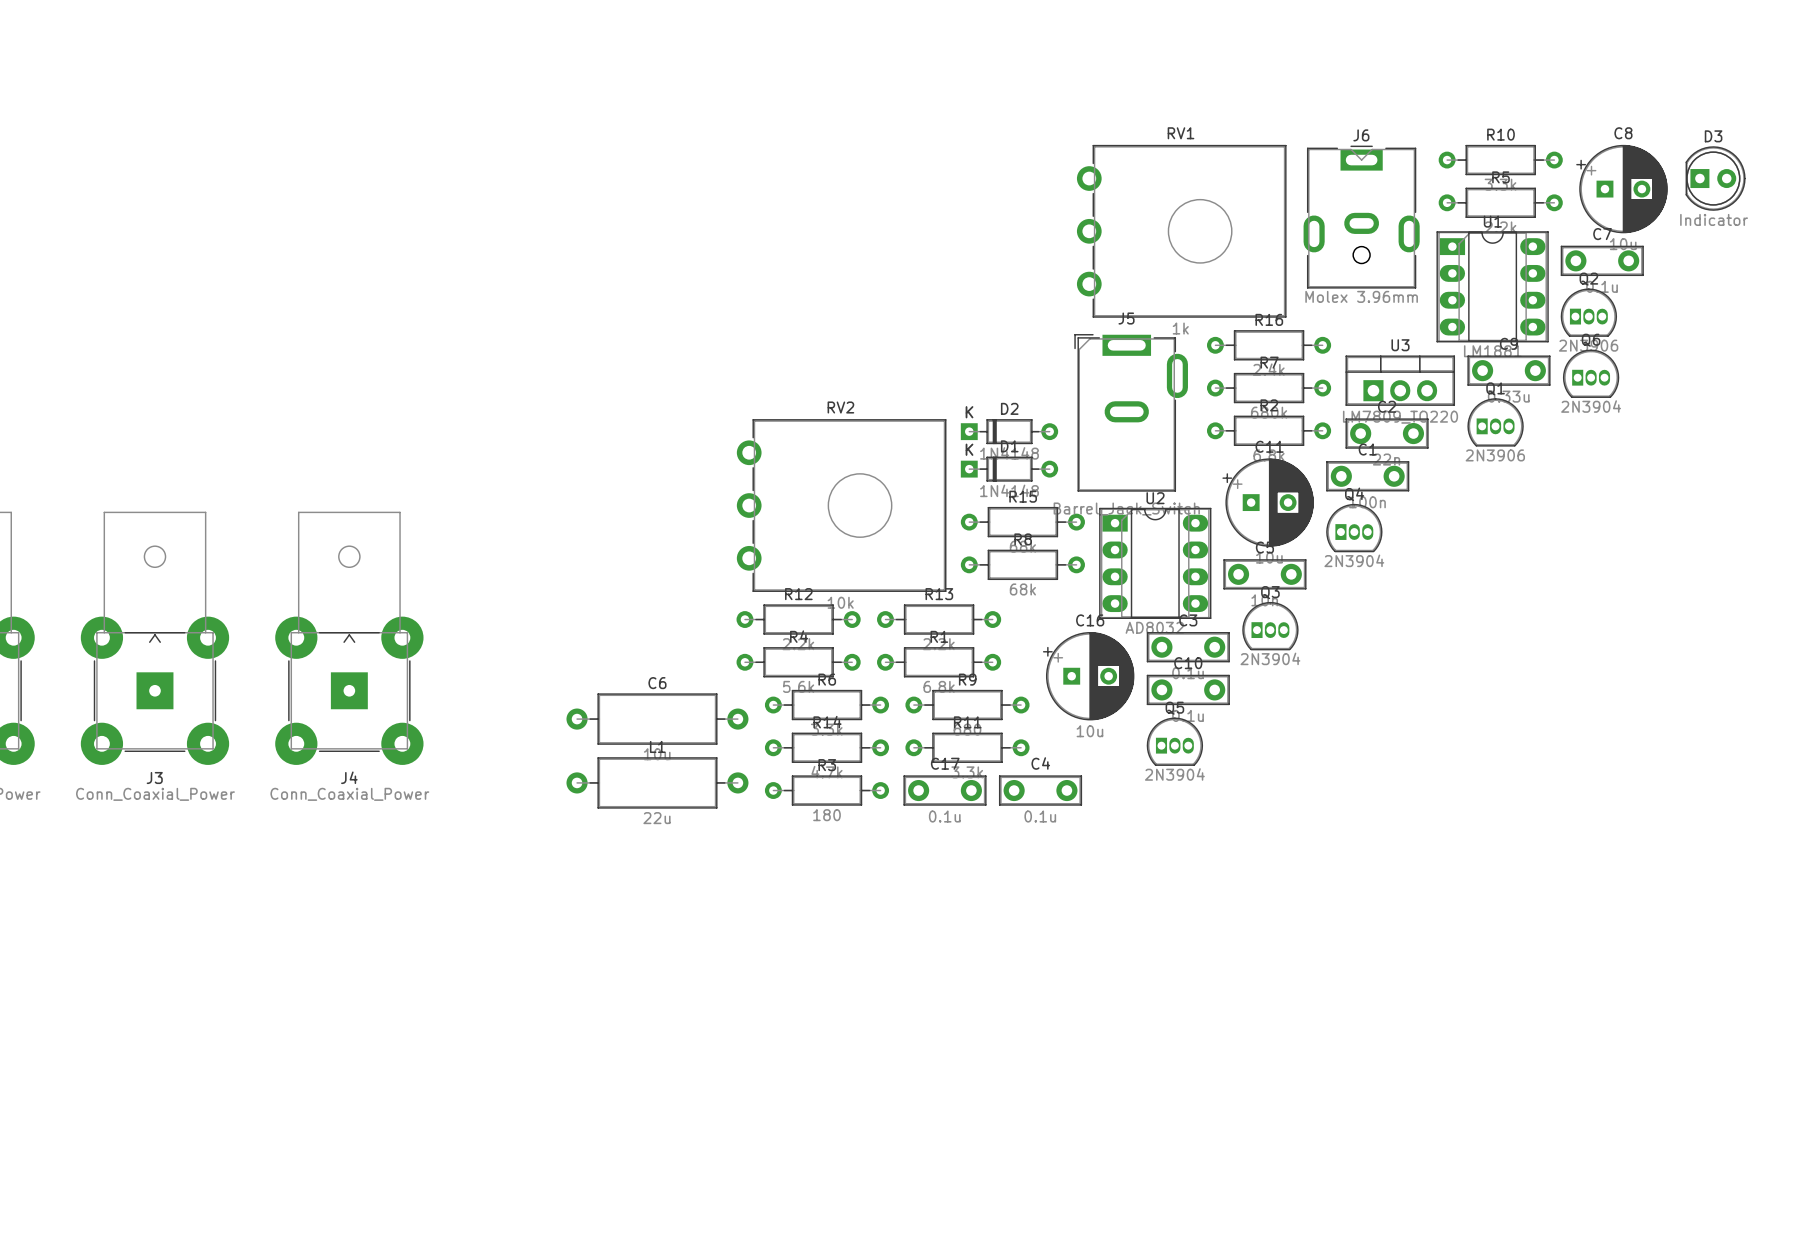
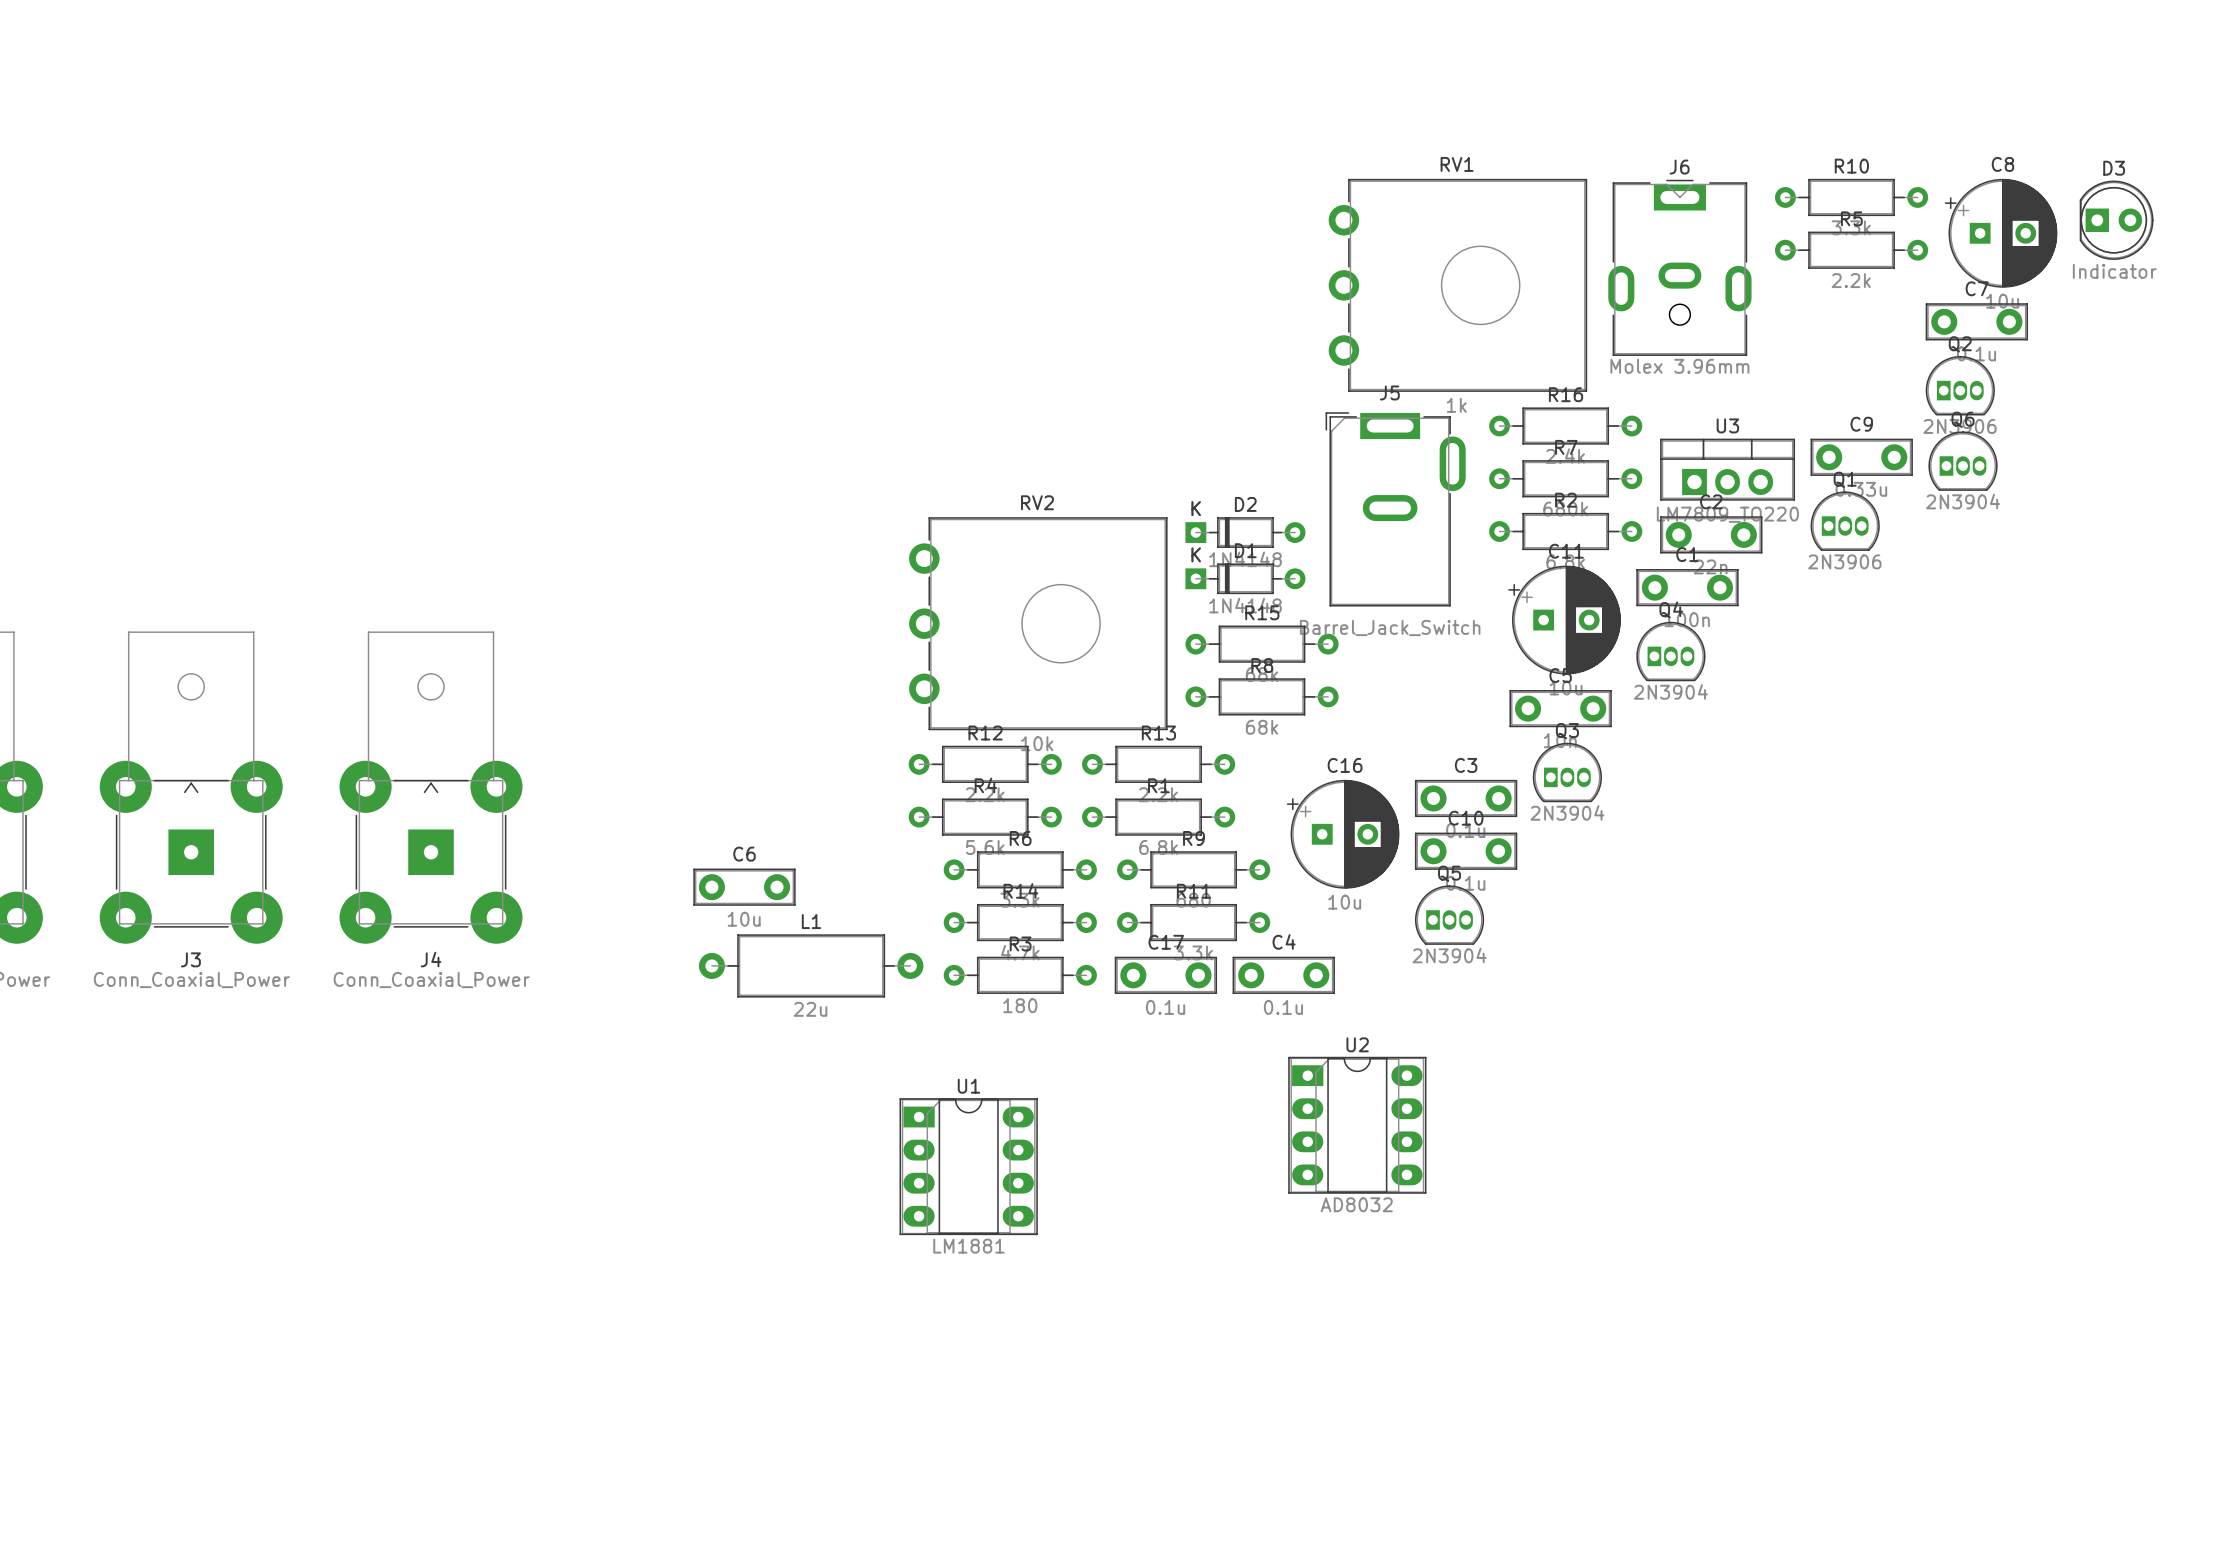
U1 position: (1492, 286) -> (968, 1166)
U2 position: (1155, 563) -> (1357, 1125)
C6 footprint: [566, 693, 749, 745] -> [693, 868, 796, 906]

